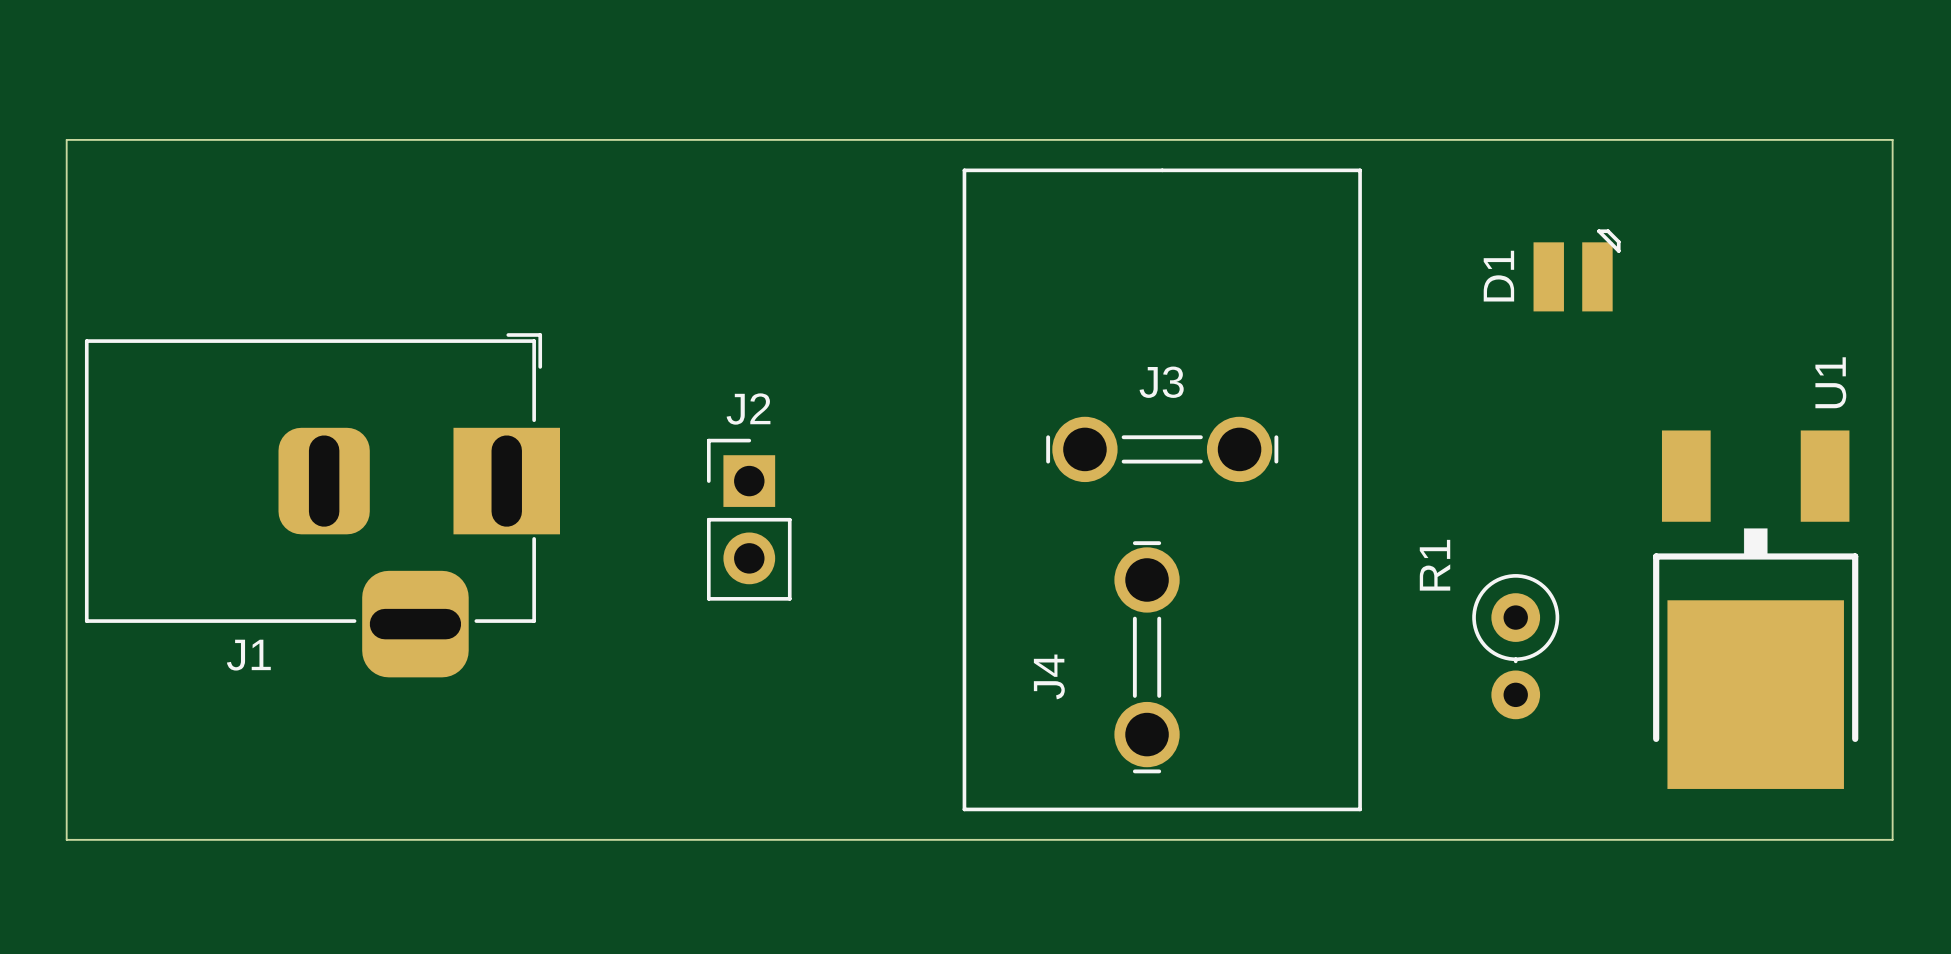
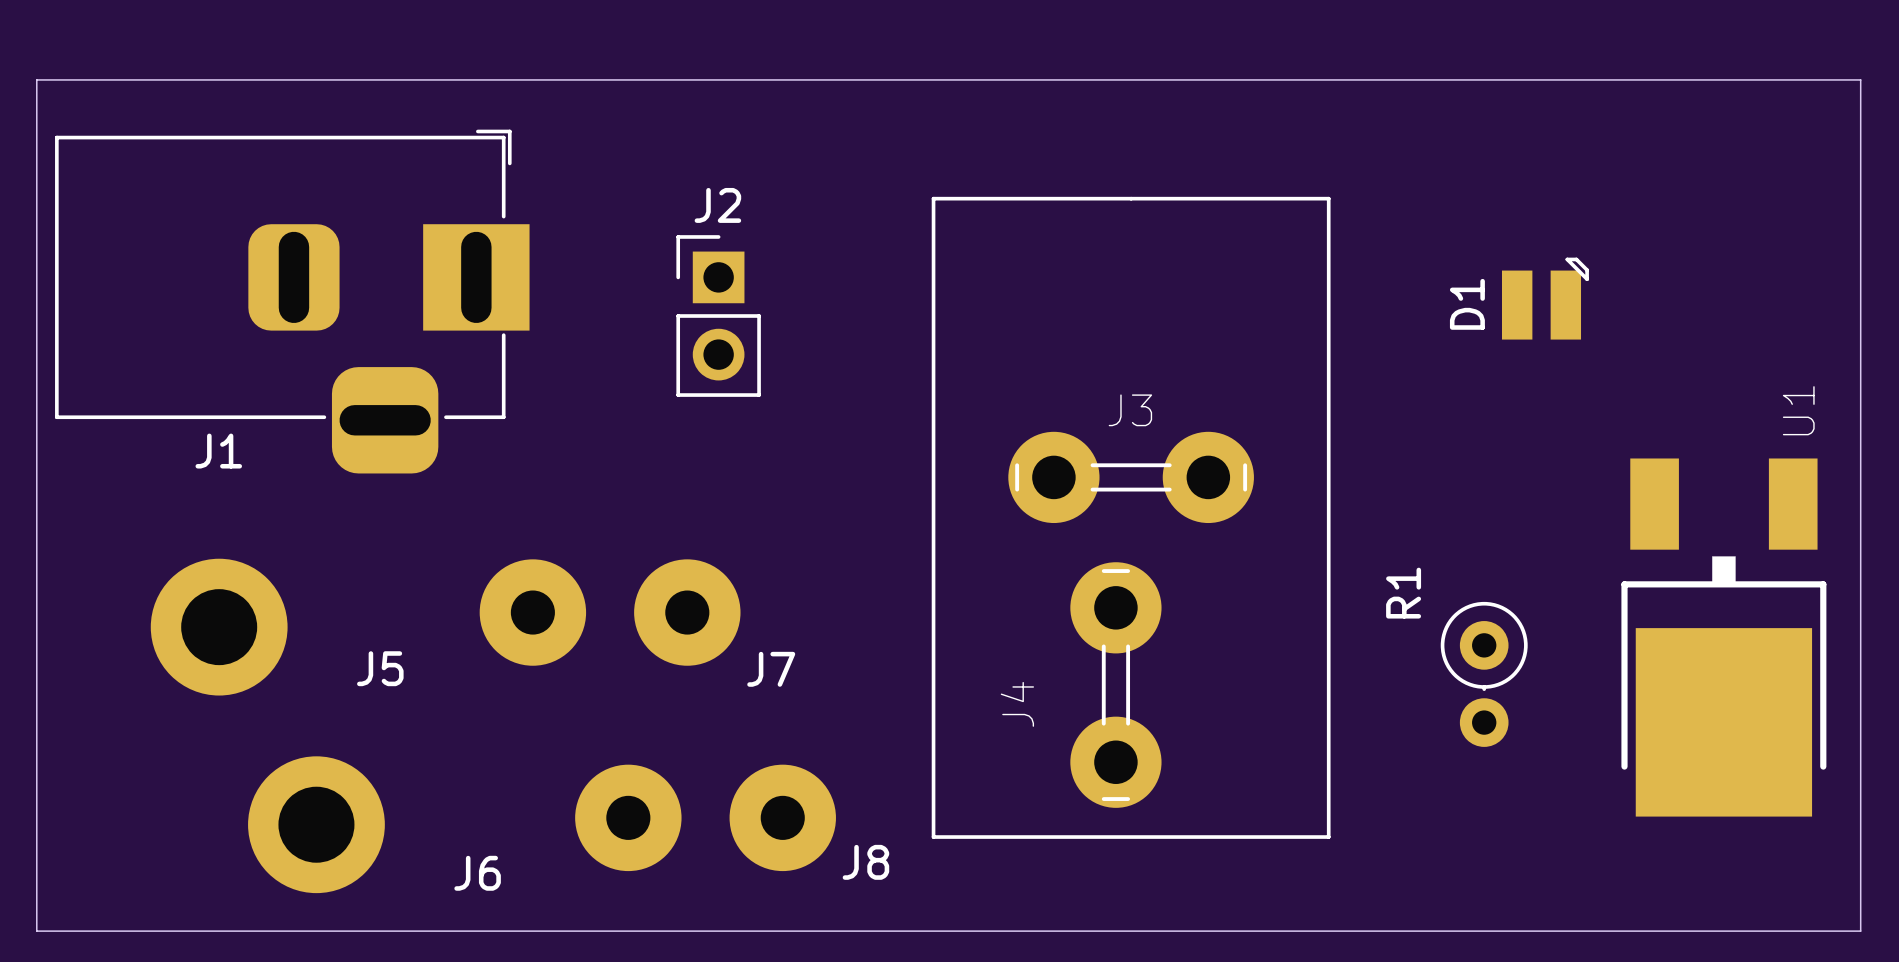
board edge: (66, 139) (1892, 139) -> (36, 168) (36, 79) (1860, 79) (1860, 168)
J3 footprint: [1046, 416, 1279, 483] -> [1008, 431, 1254, 524]
J1 position: (322, 505) -> (292, 301)
J2 position: (749, 519) -> (718, 316)
J4 footprint: [1114, 541, 1180, 774] -> [1070, 562, 1162, 808]
J7: none -> (610, 612)
J5: none -> (219, 627)
J8: none -> (705, 817)
J6: none -> (316, 824)
board edge: (66, 839) (1892, 839) -> (36, 867) (36, 931) (1860, 931) (1860, 867)

